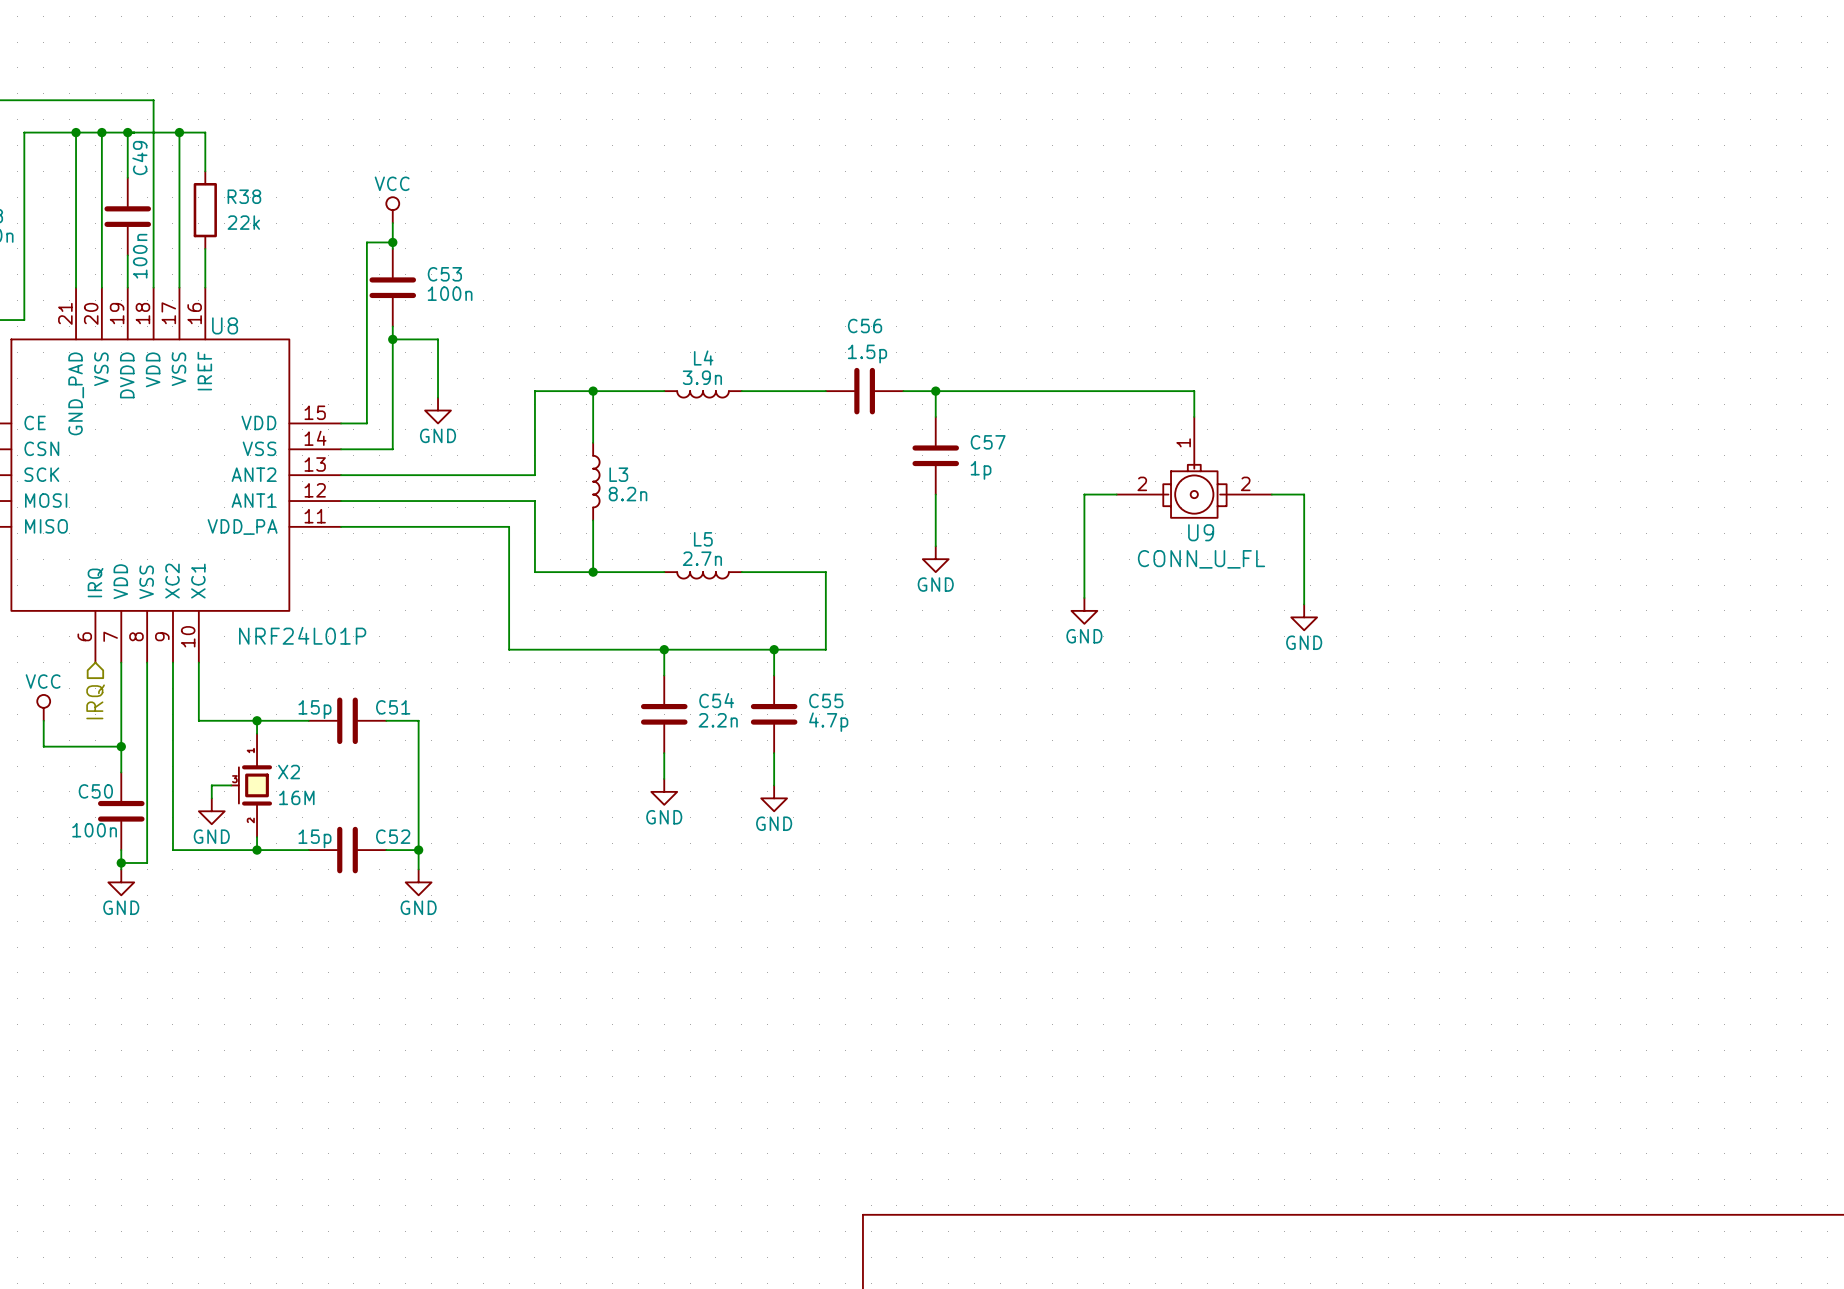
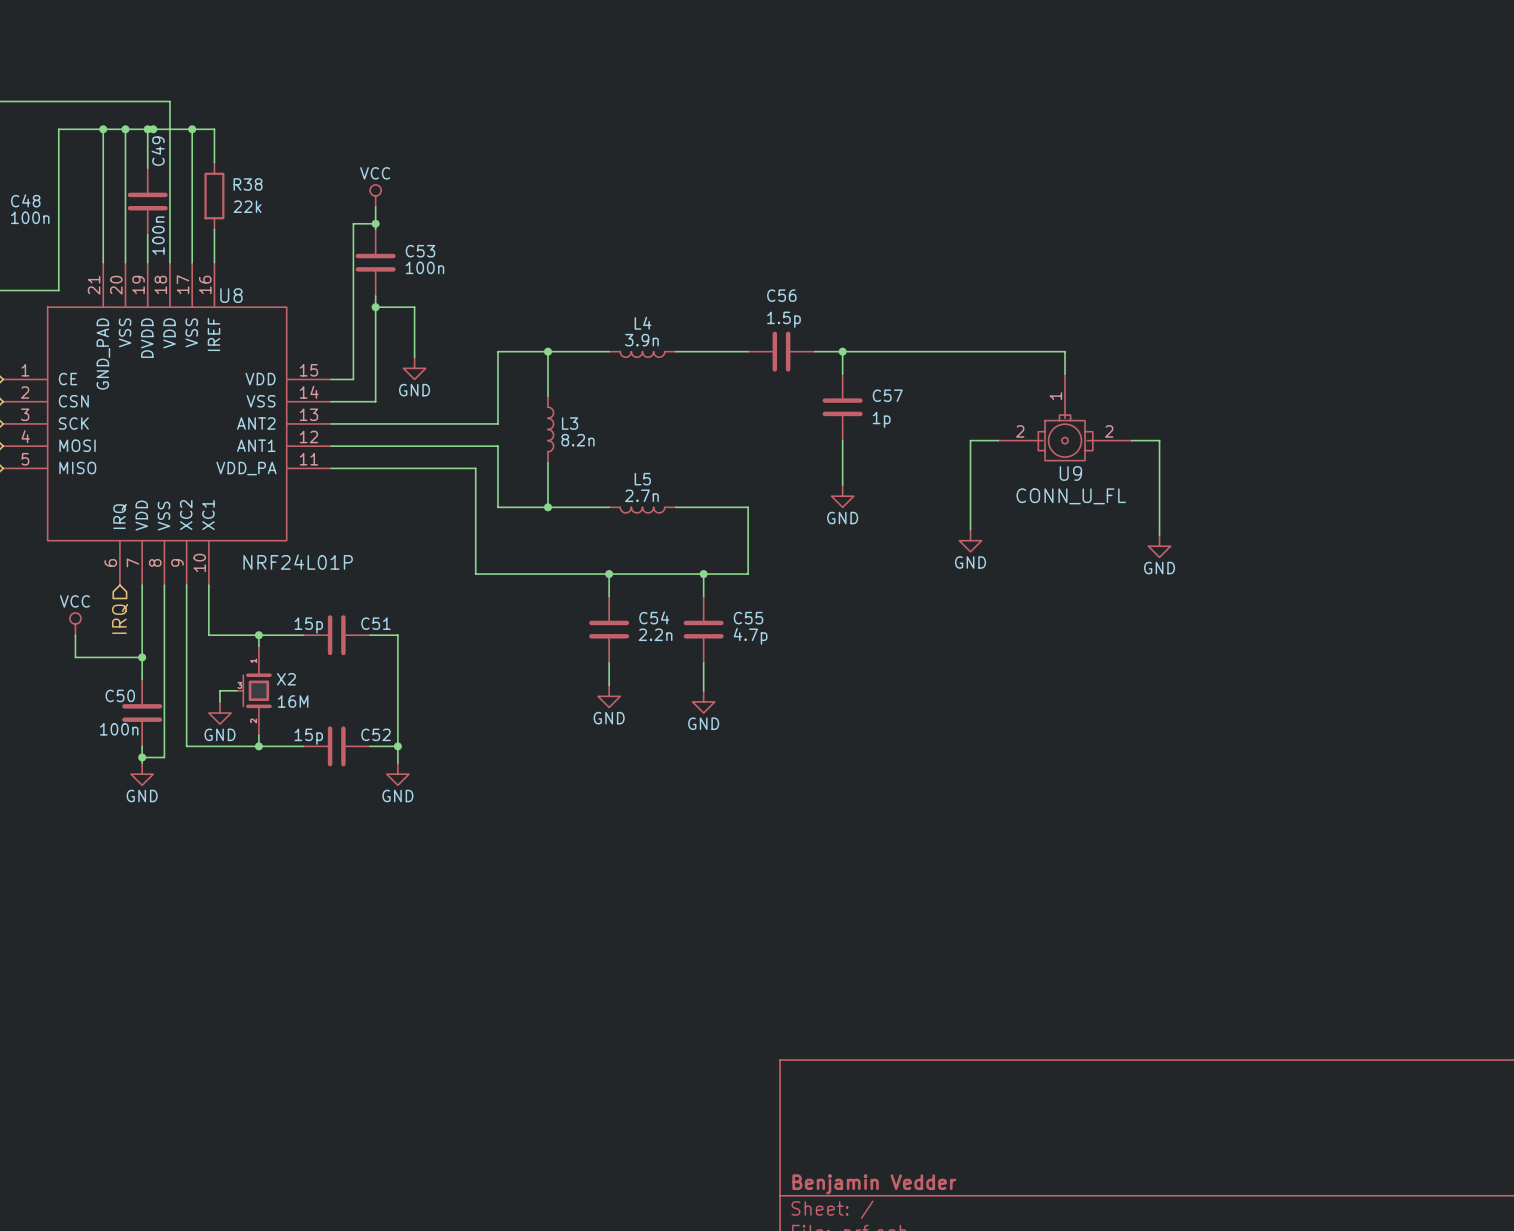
junction: none -> (153, 129)

